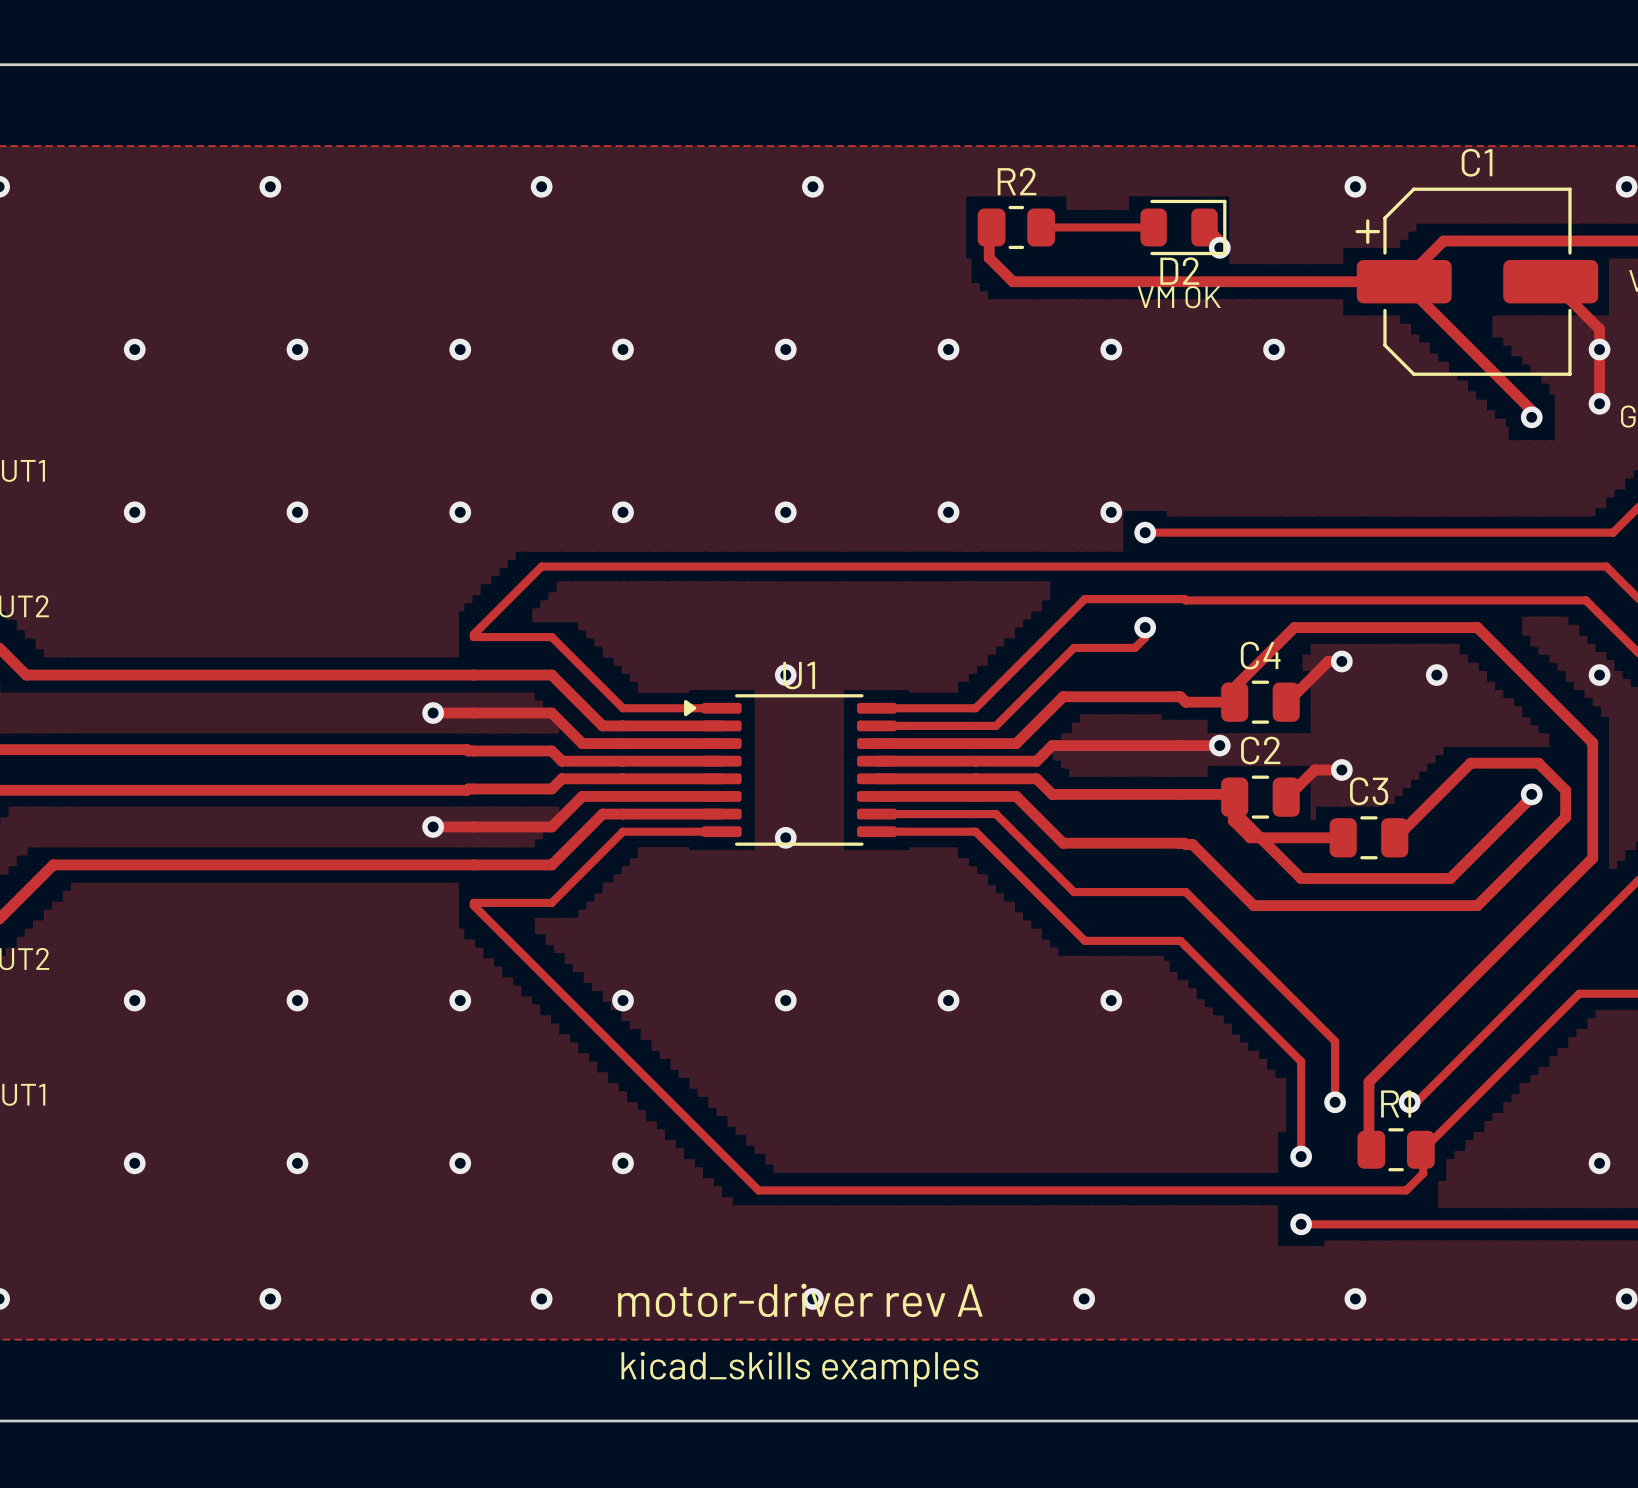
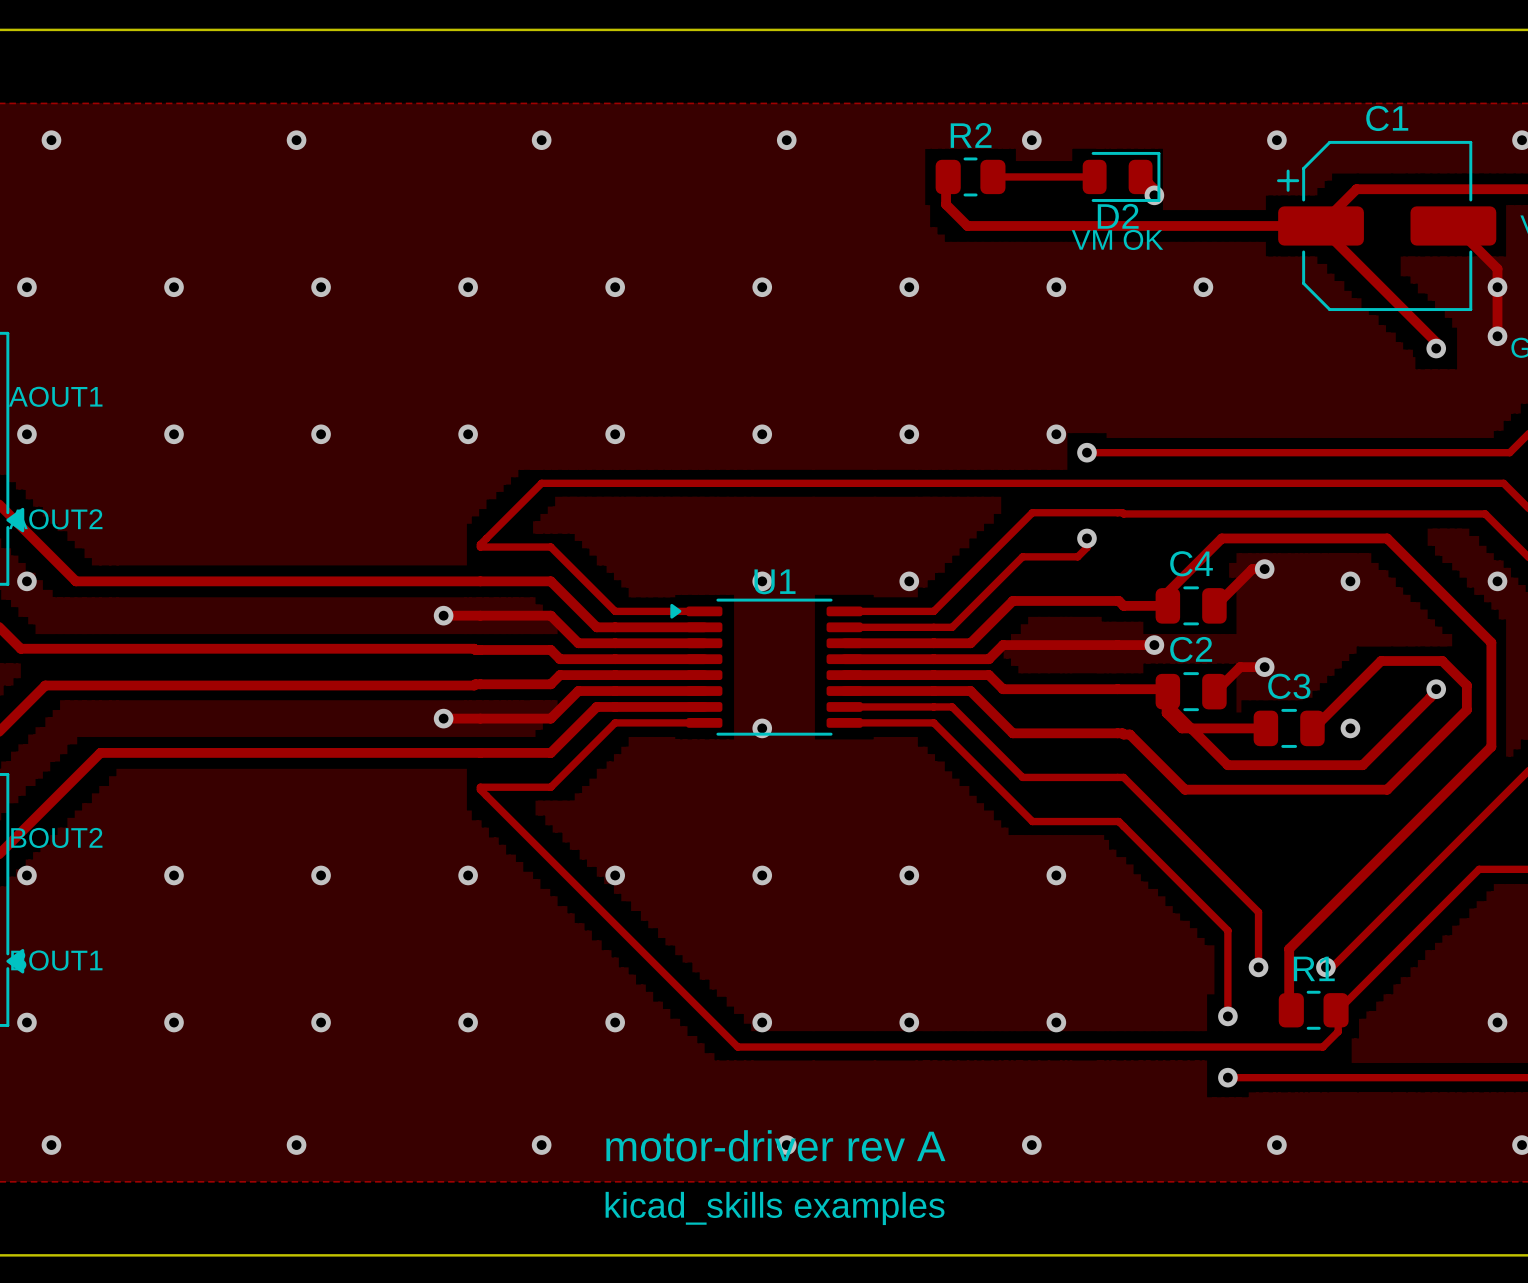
via: none -> (1031, 140)
via: none -> (909, 581)
via: none -> (1350, 728)
via: none -> (762, 1022)
via: none -> (909, 1022)
via: none -> (1056, 1022)

